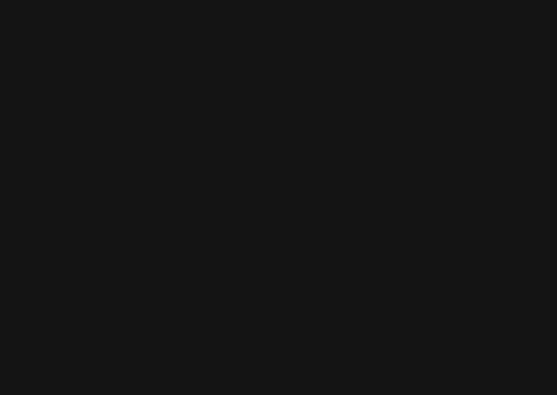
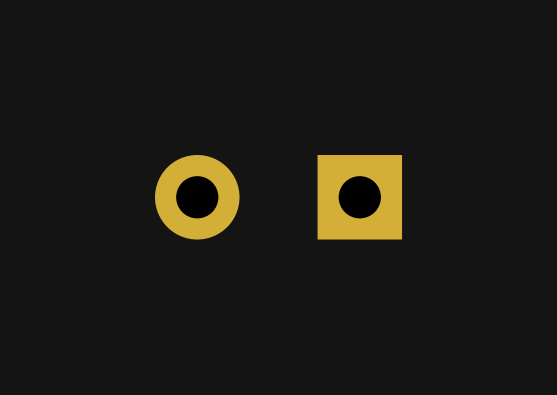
part: none -> (278, 197)

